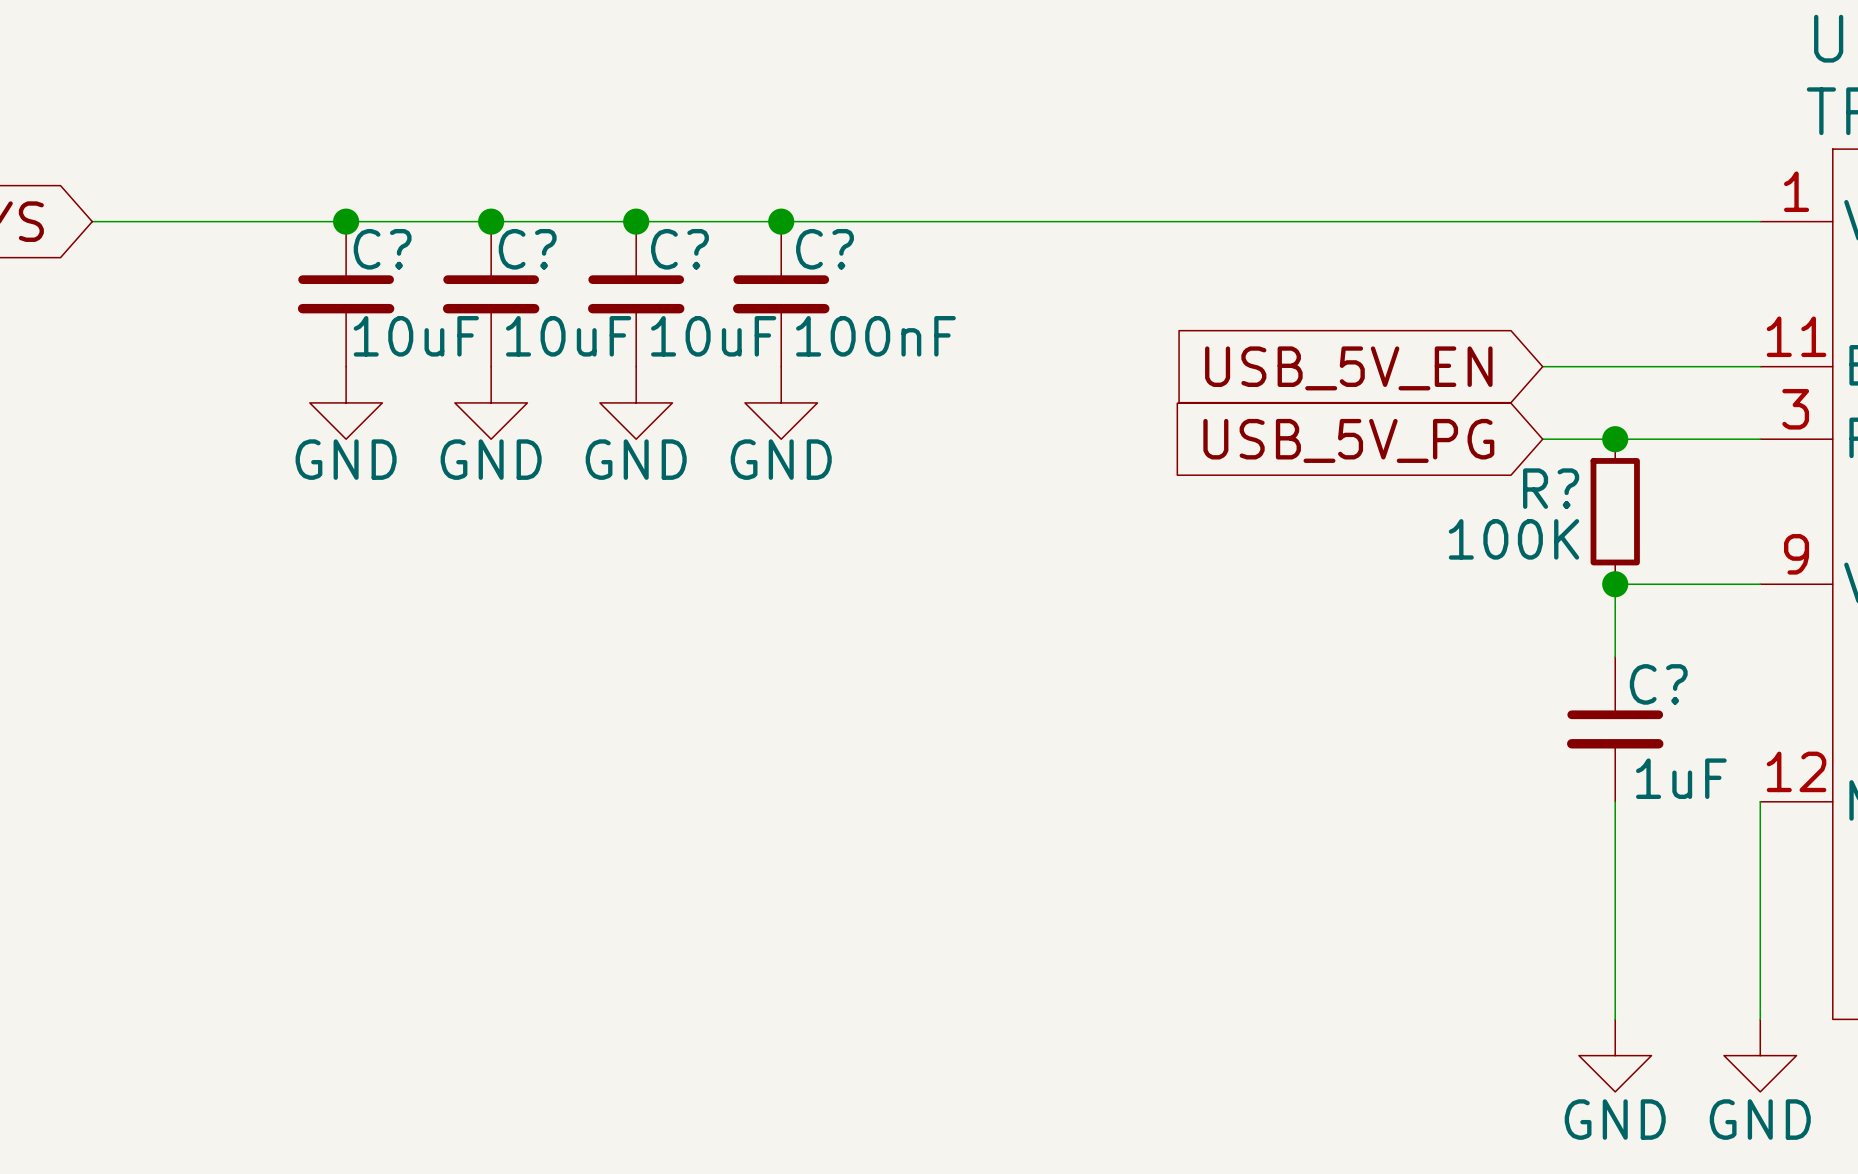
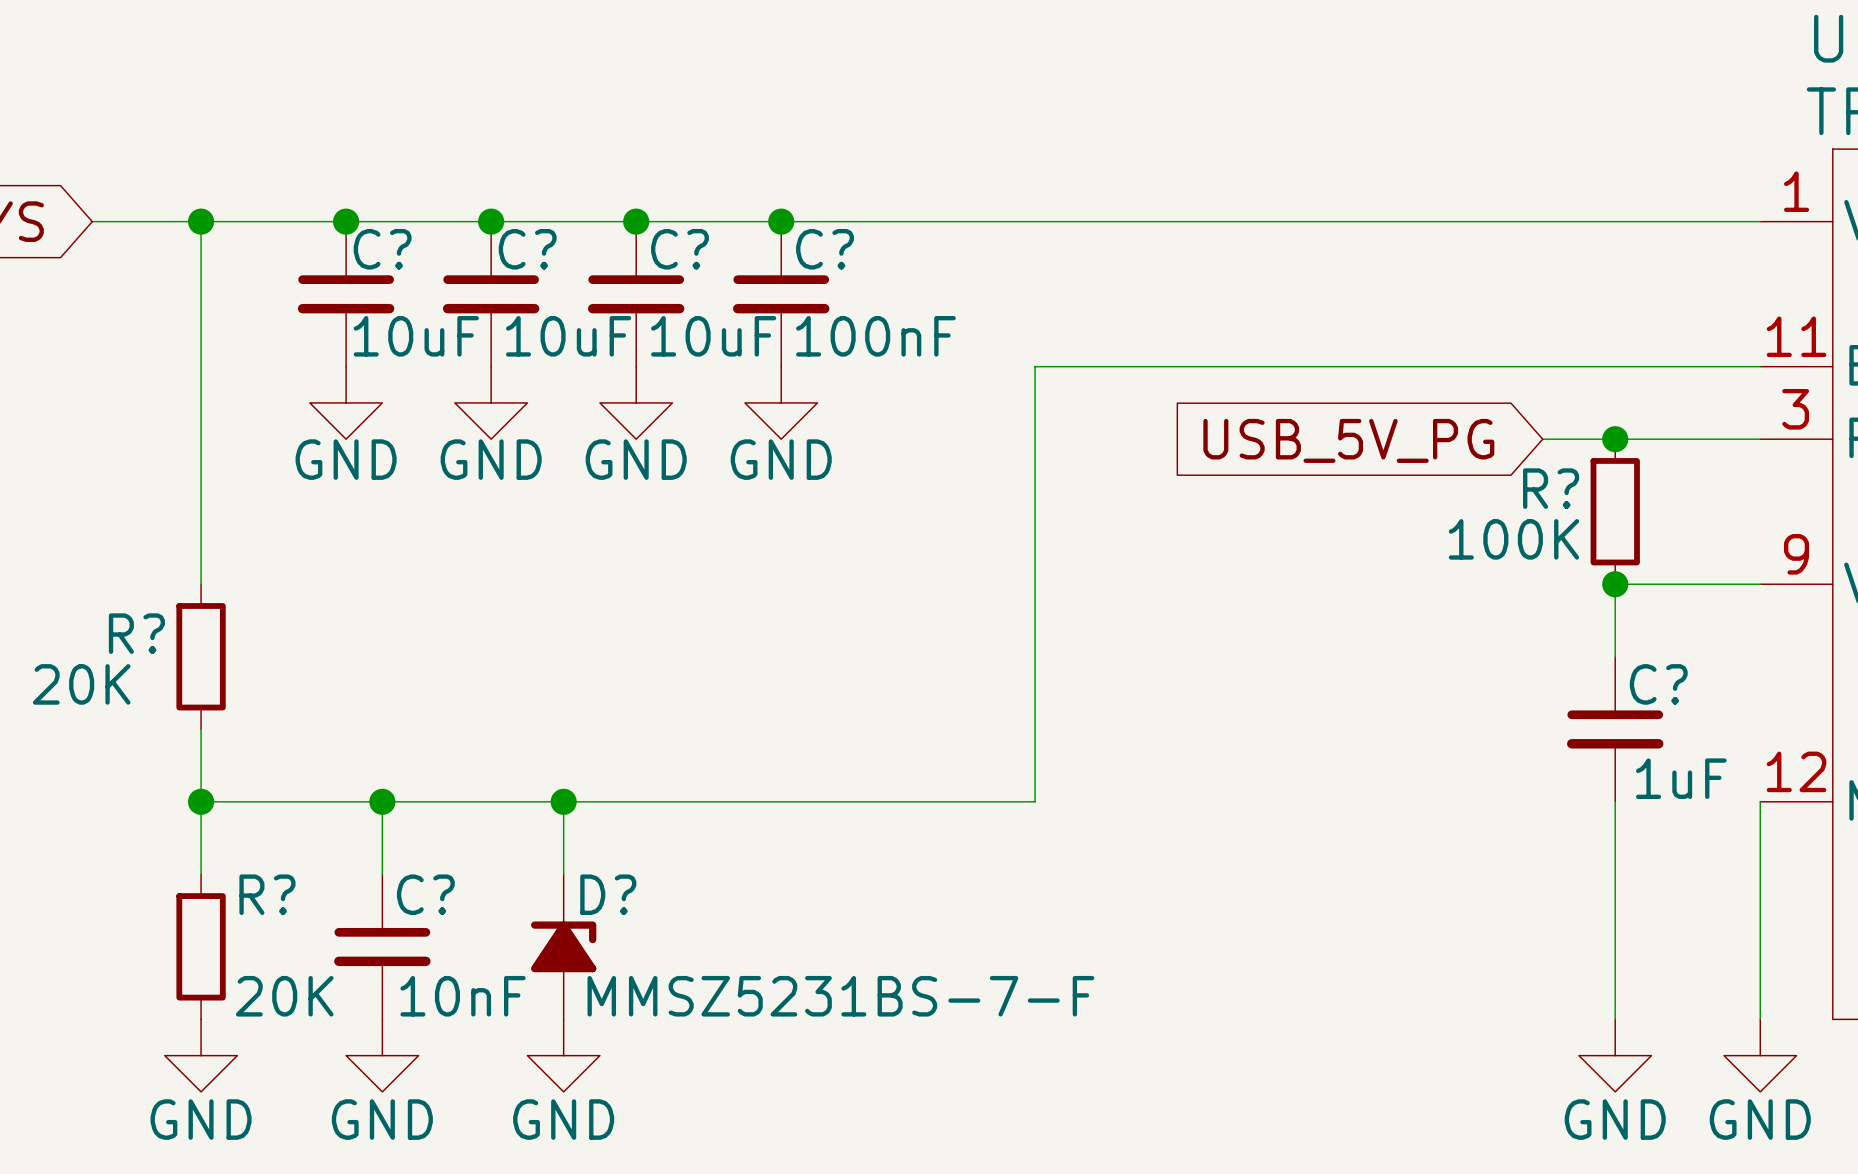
wire: none -> (201, 221) (201, 584)
junction: none -> (201, 221)
wire: none -> (1542, 366) (1035, 366) (1035, 801) (201, 801)
global label: USB_5V_EN (1348, 368) -> none
R?: none -> 20K (201, 656)
wire: none -> (201, 729) (201, 874)
junction: none -> (201, 801)
wire: none -> (382, 801) (382, 874)
junction: none -> (382, 801)
wire: none -> (563, 801) (563, 874)
junction: none -> (563, 801)
R?: none -> 20K (201, 946)
C?: none -> 10nF (382, 946)
D?: none -> MMSZ5231BS-7-F (563, 946)
power symbol: none -> GND (201, 1055)
power symbol: none -> GND (382, 1055)
power symbol: none -> GND (563, 1055)

